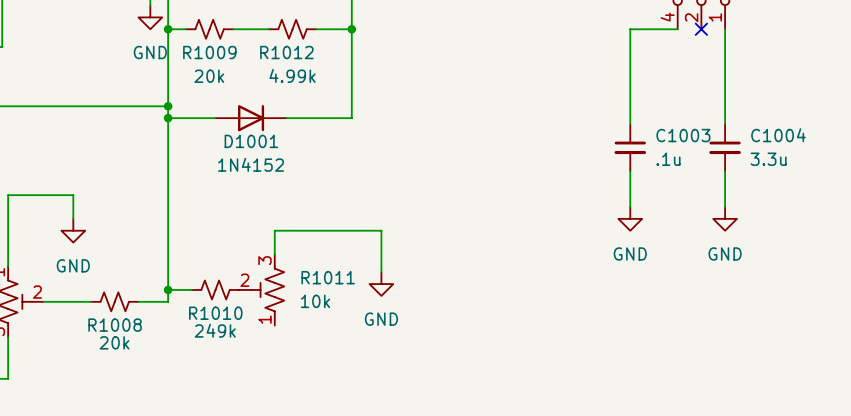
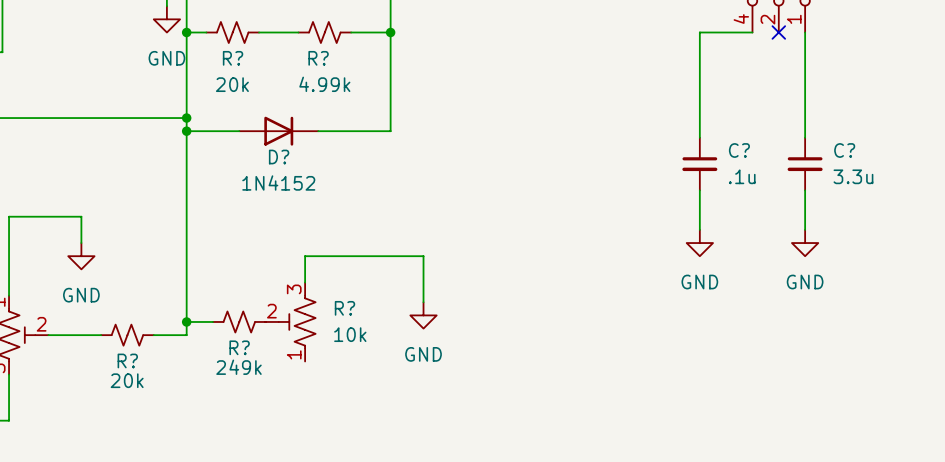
R1009 name: R1009 (209, 52) -> R? (233, 58)
R1012 name: R1012 (286, 52) -> R? (318, 58)
C1003 name: C1003 (683, 135) -> C? (739, 150)
C1004 name: C1004 (778, 135) -> C? (844, 150)
D1001 name: D1001 (251, 141) -> D? (279, 157)
R1011 name: R1011 (328, 277) -> R? (344, 308)
R1010 name: R1010 (215, 313) -> R? (239, 347)
R1008 name: R1008 (115, 325) -> R? (127, 360)

